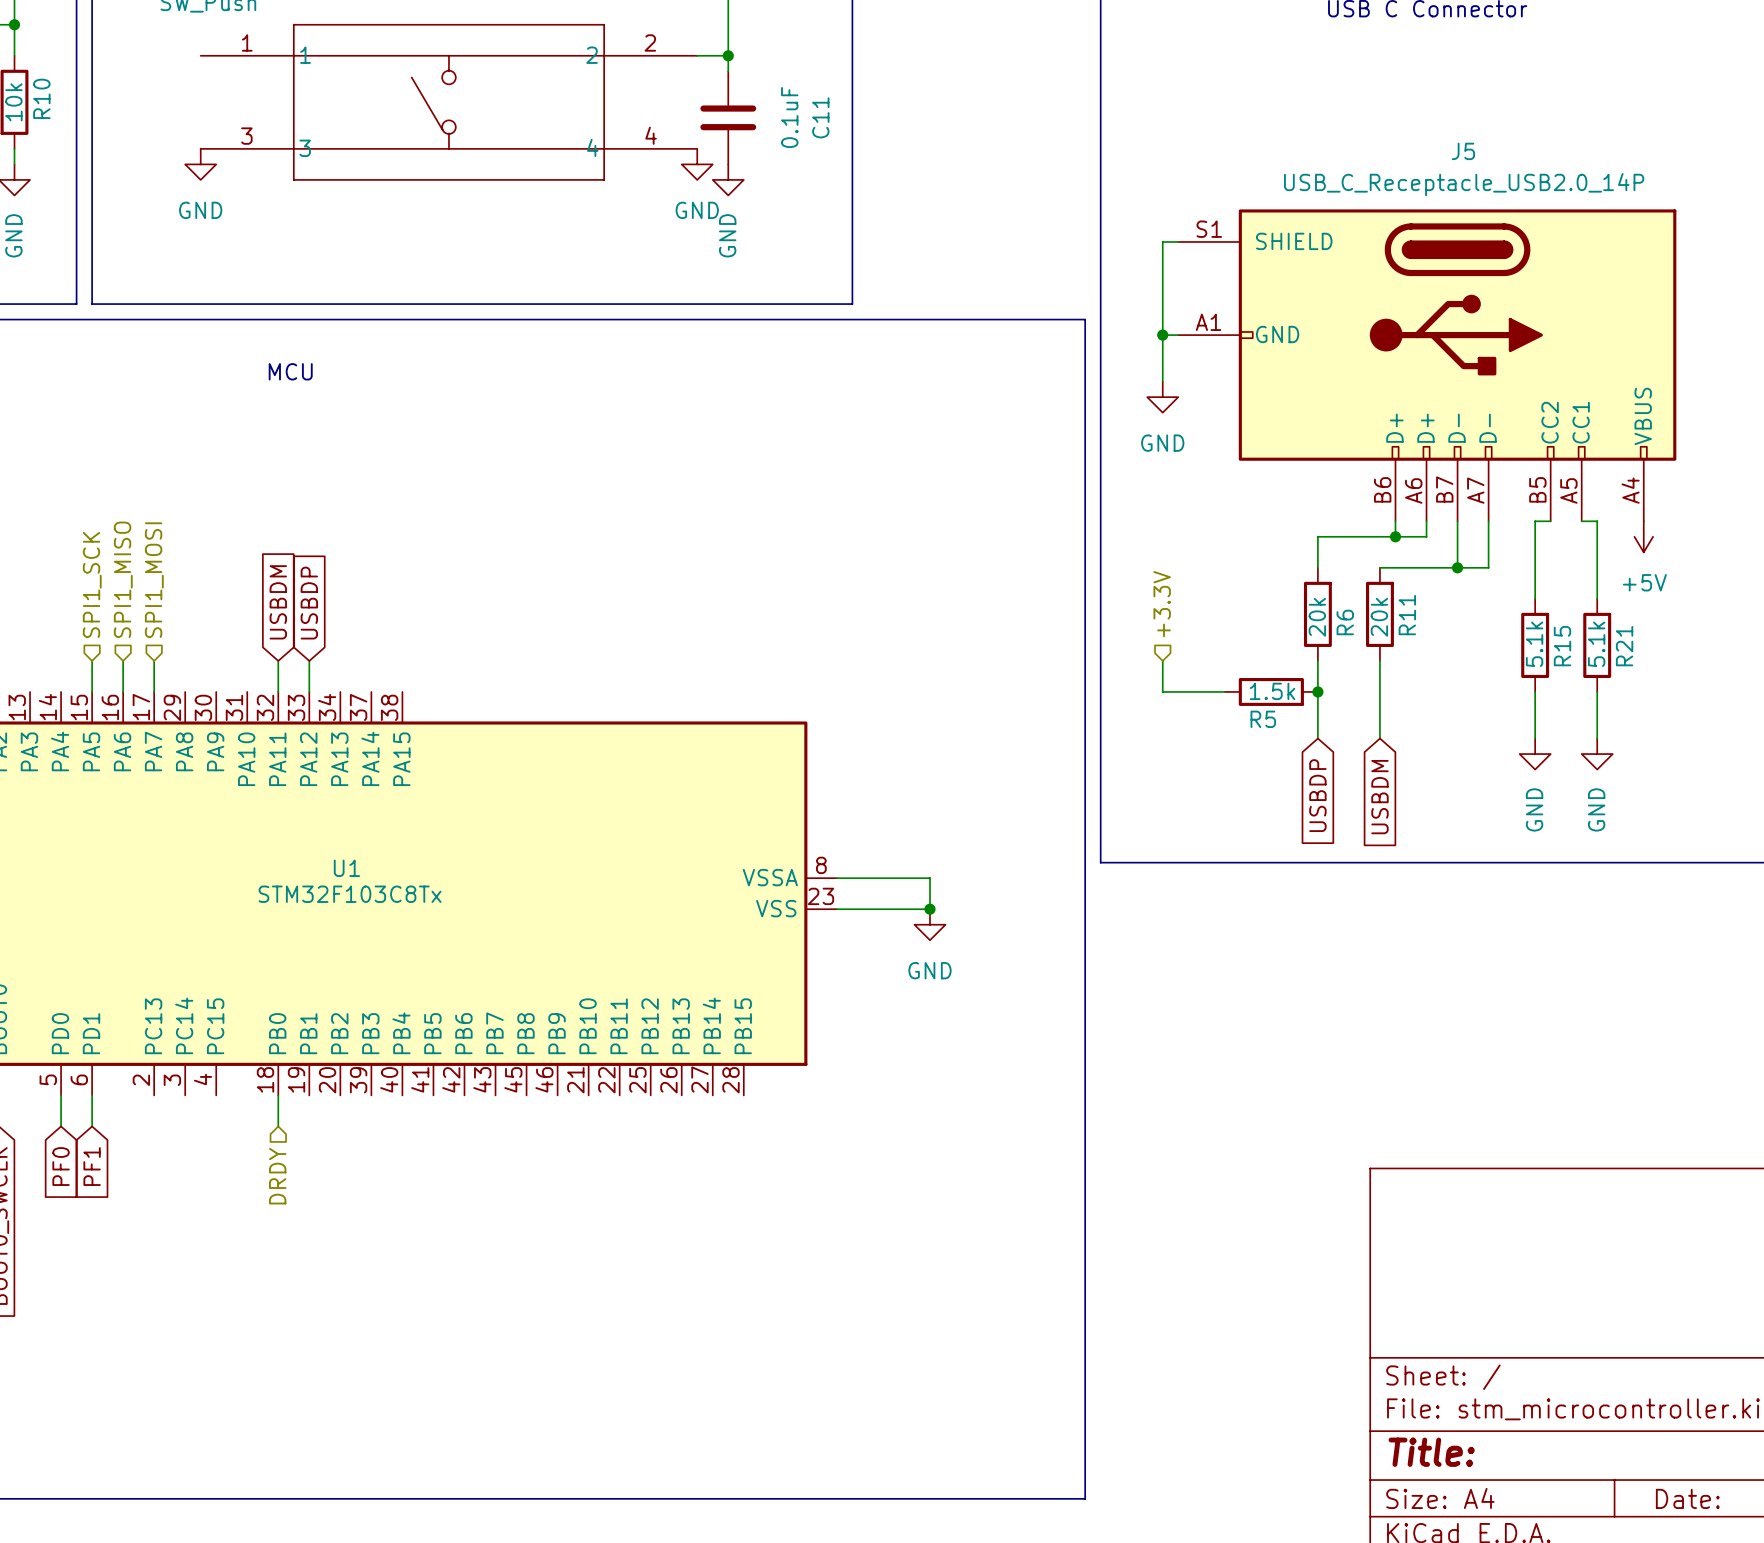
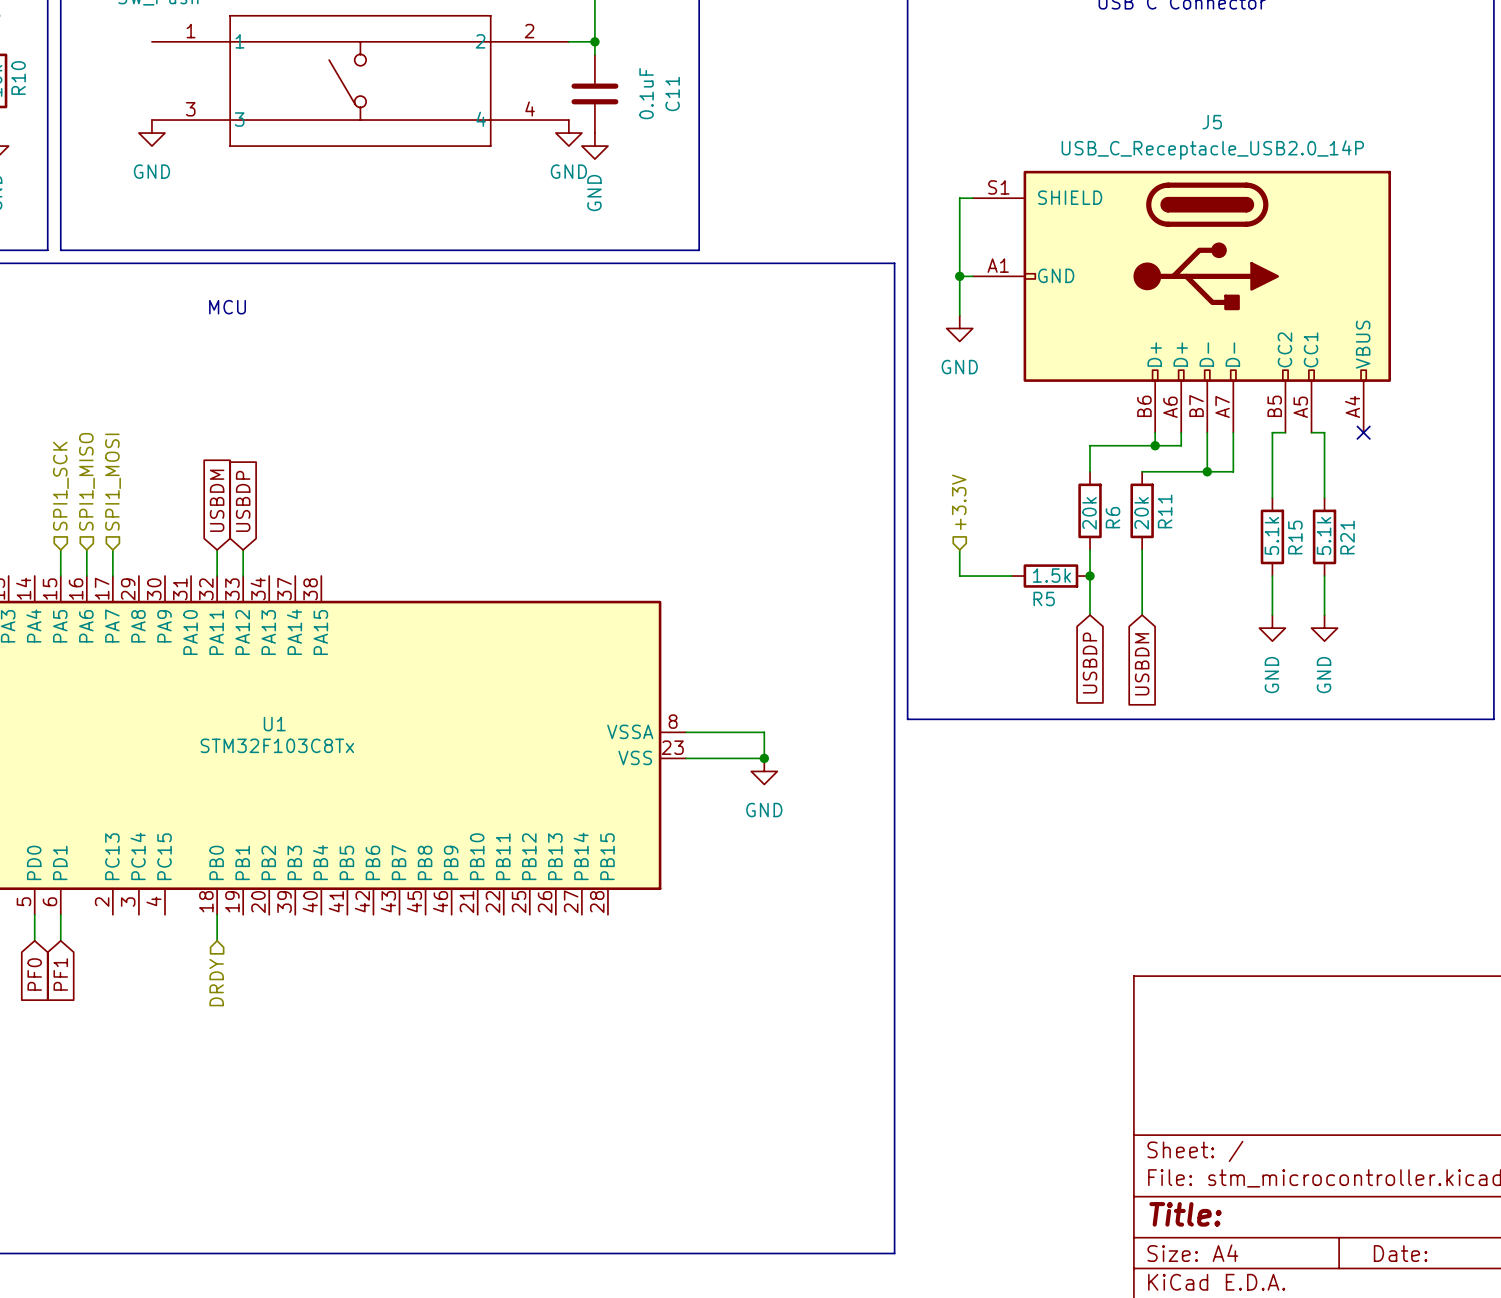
no-connect mark: none -> (1363, 432)
power symbol: +5V (1643, 536) -> none

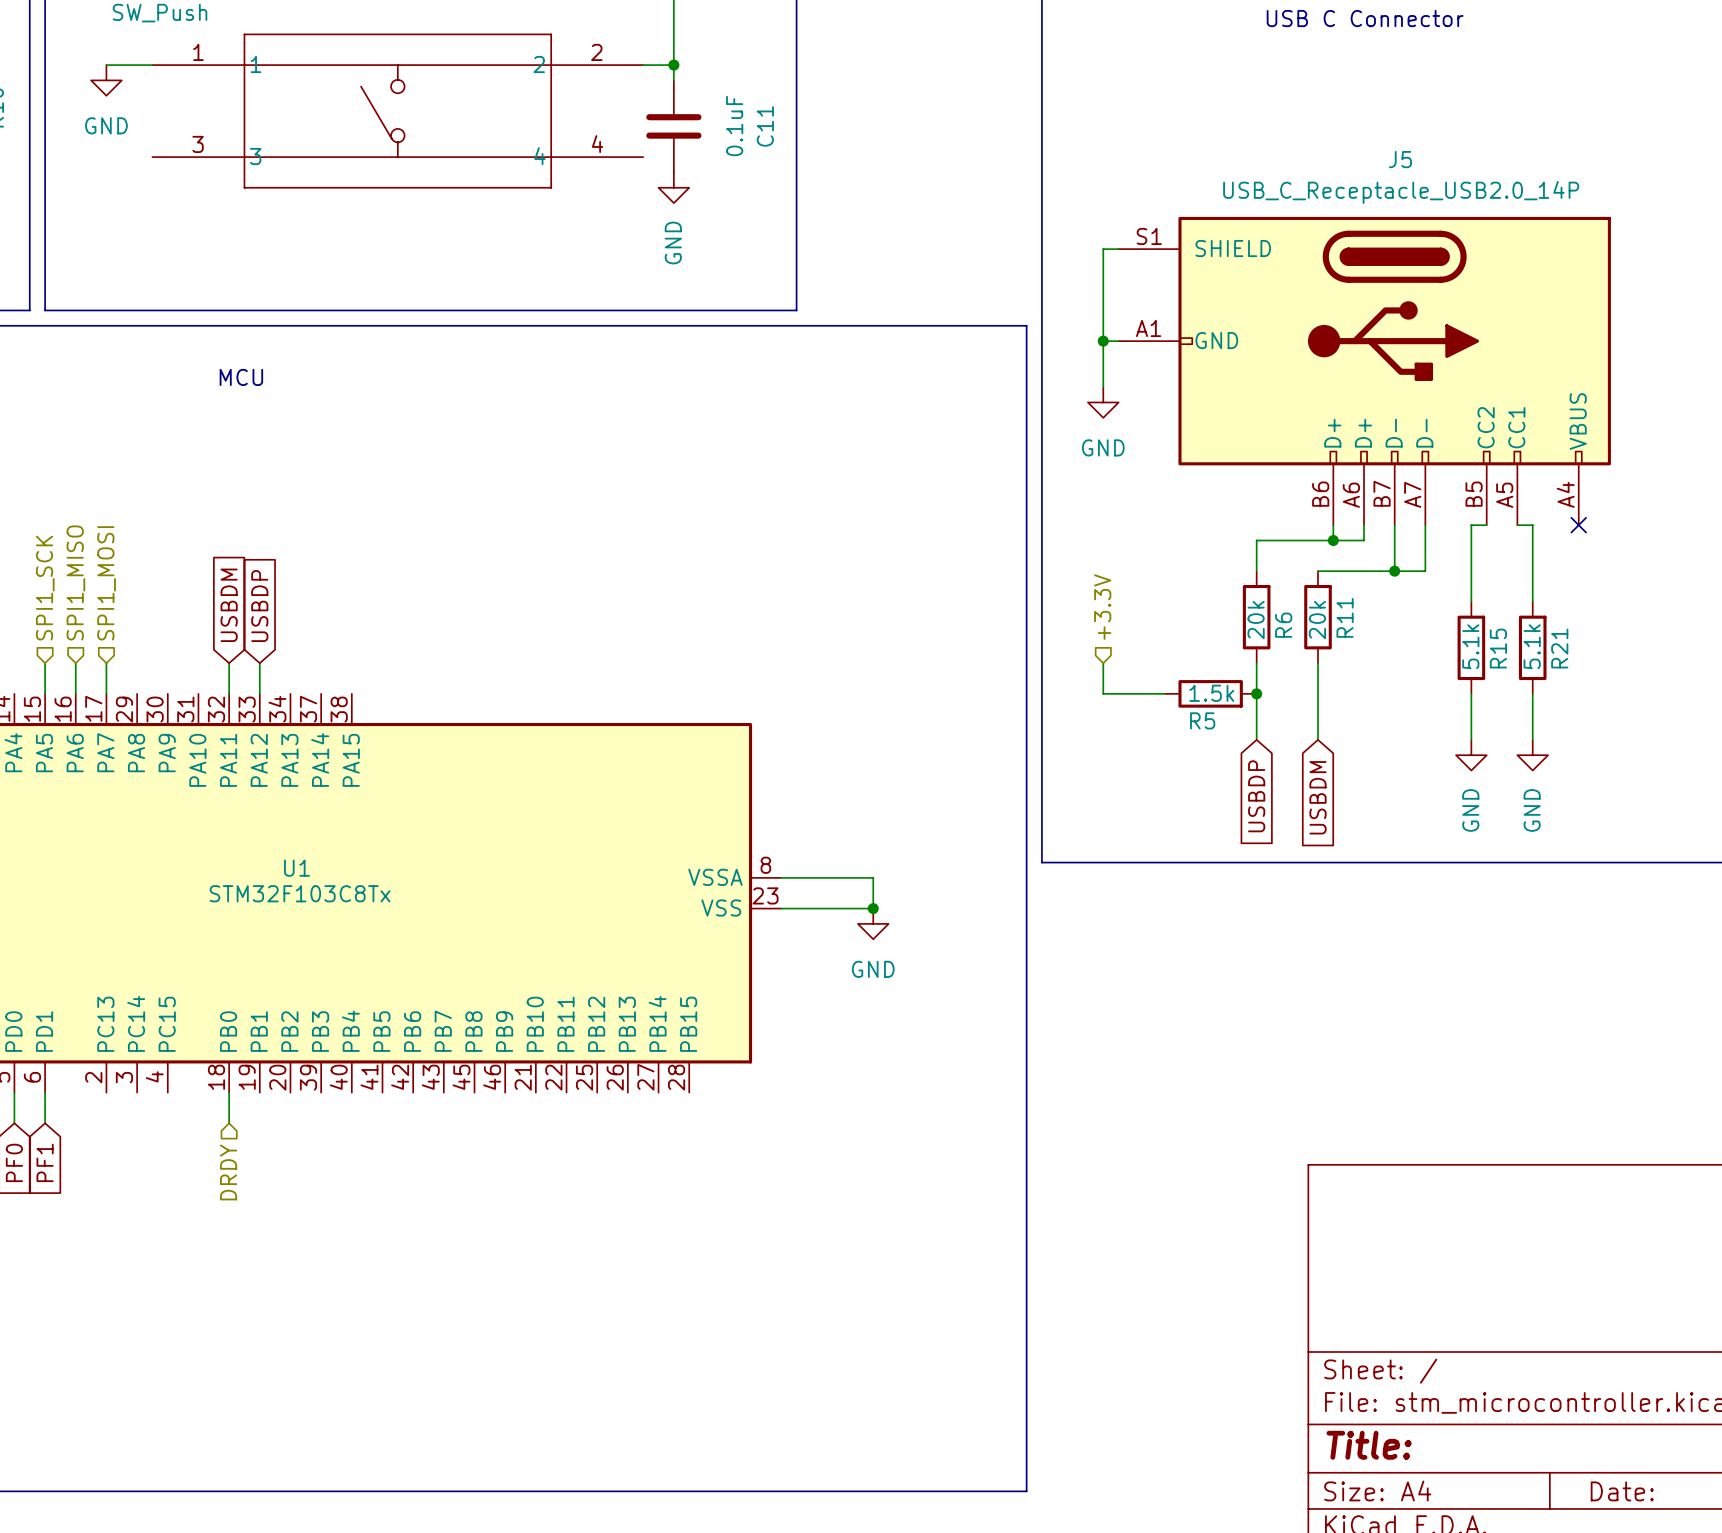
wire: none -> (106, 65) (152, 65)
power symbol position: GND (151, 133) -> GND (106, 80)
power symbol: GND (568, 133) -> none

